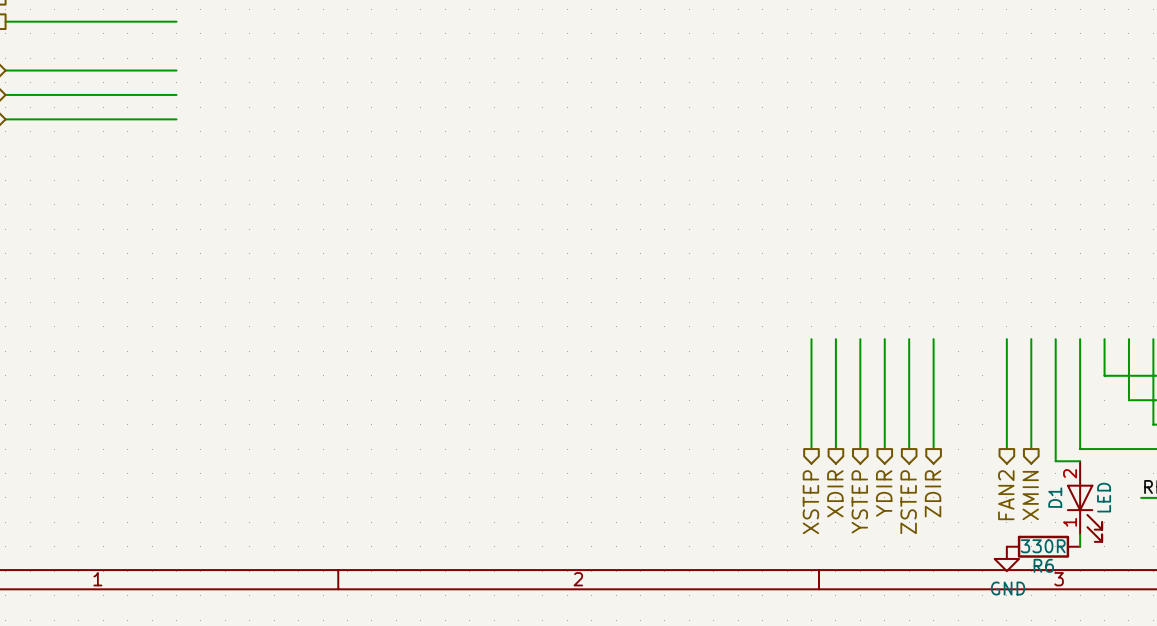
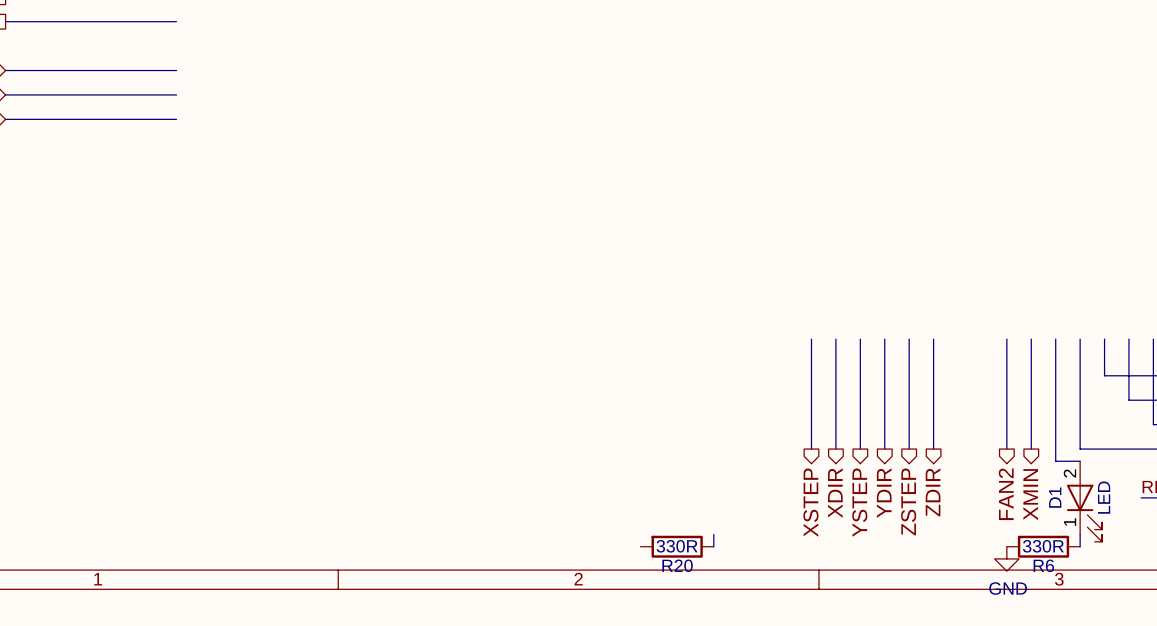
wire: none -> (713, 534) (713, 546)
R20: none -> 330R (677, 546)

